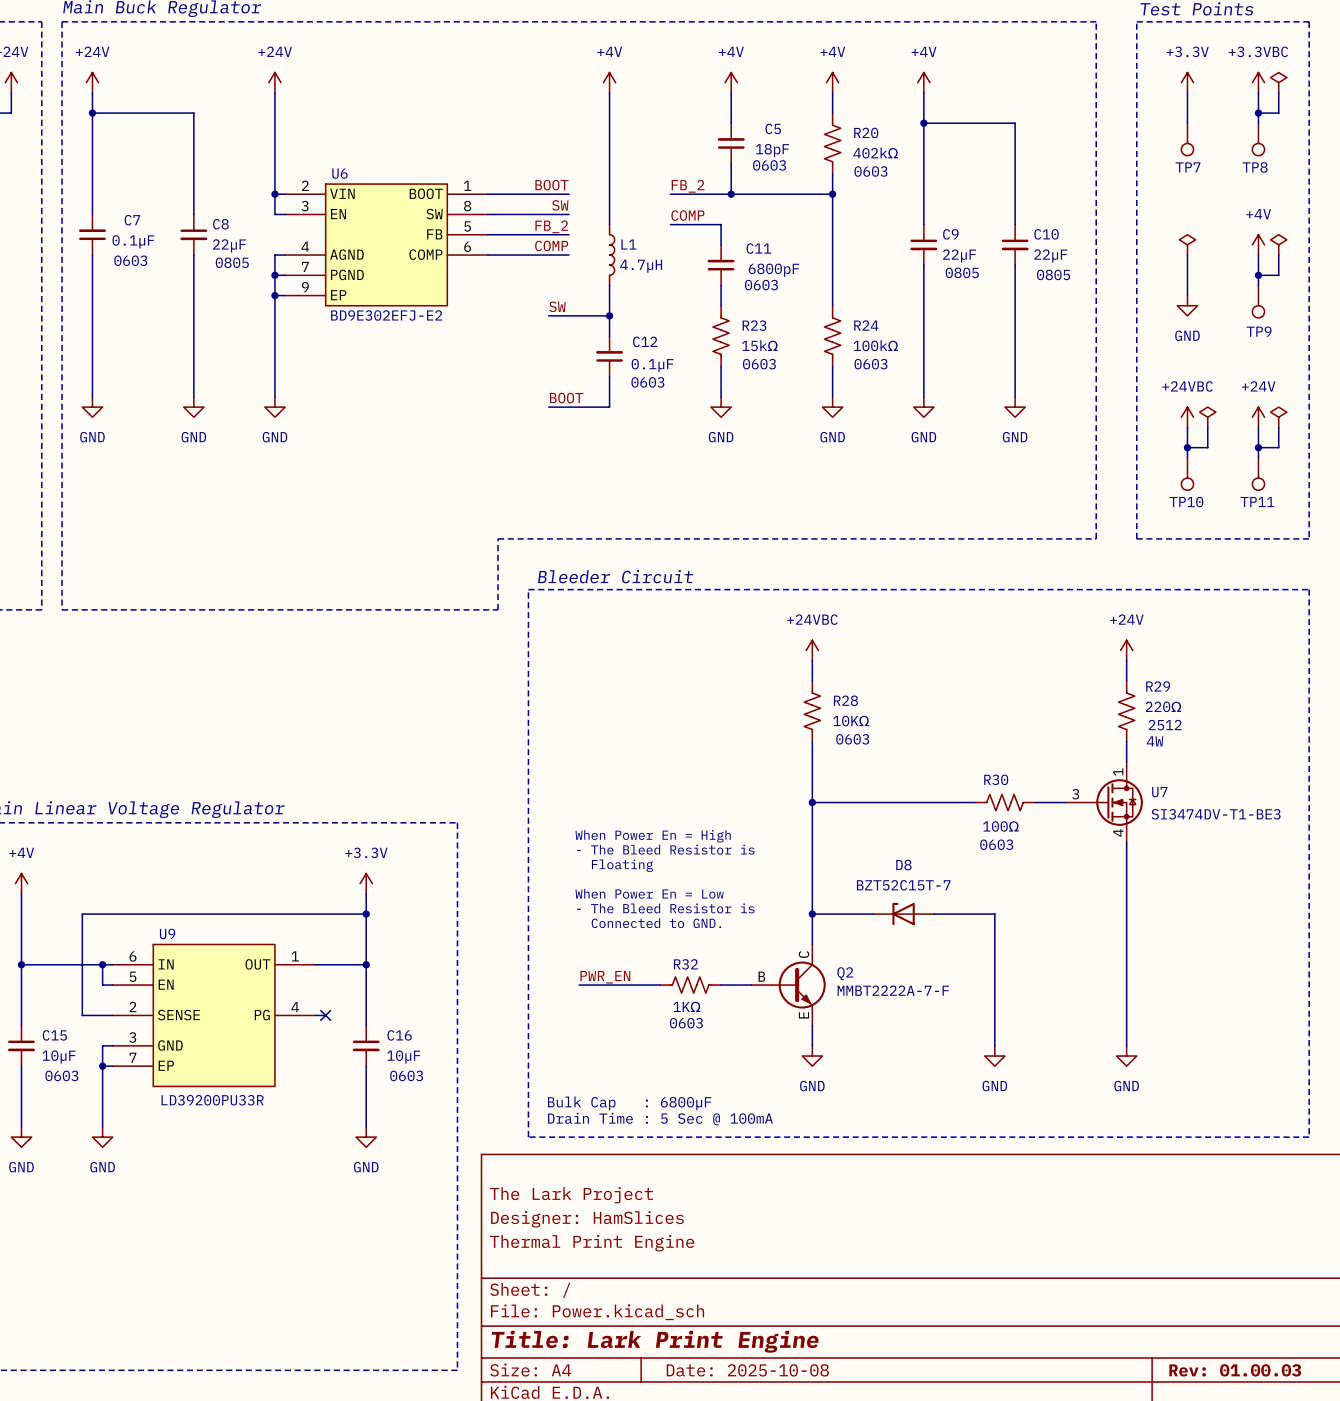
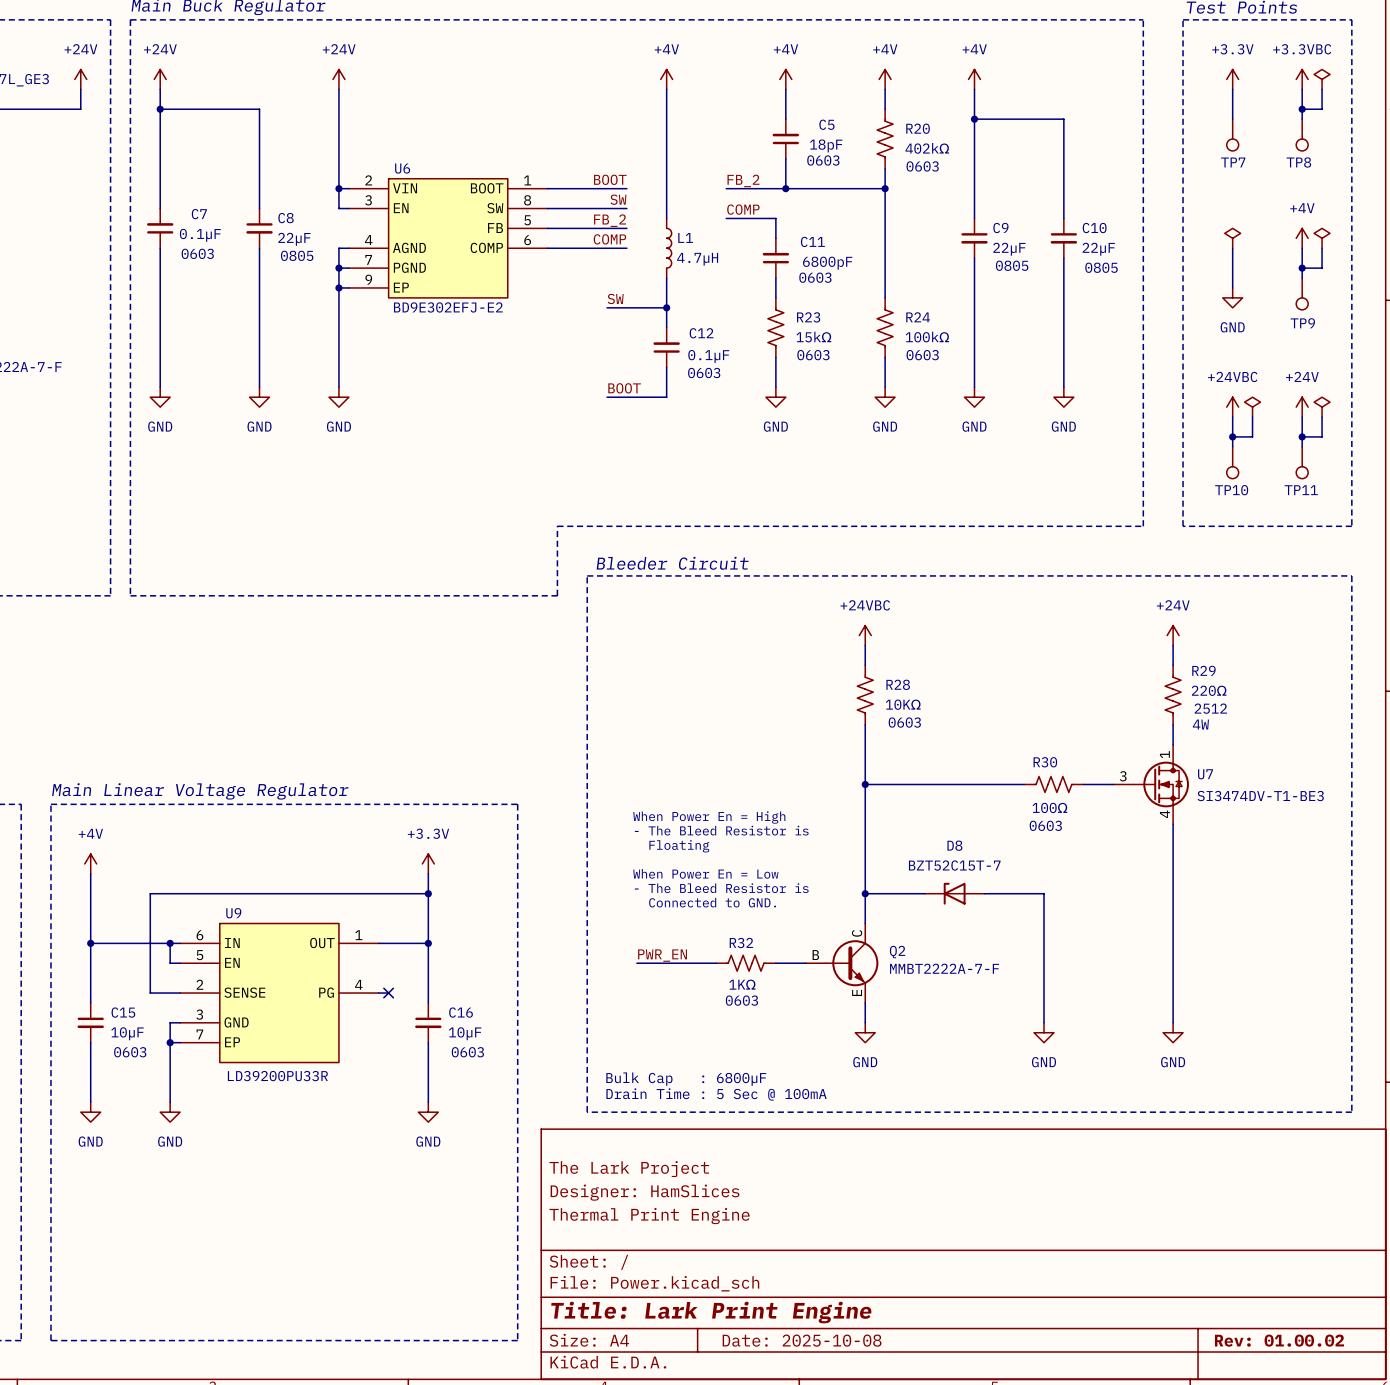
title block: Rev: 01.00.03 (1235, 1370) -> Rev: 01.00.02 (1279, 1340)

